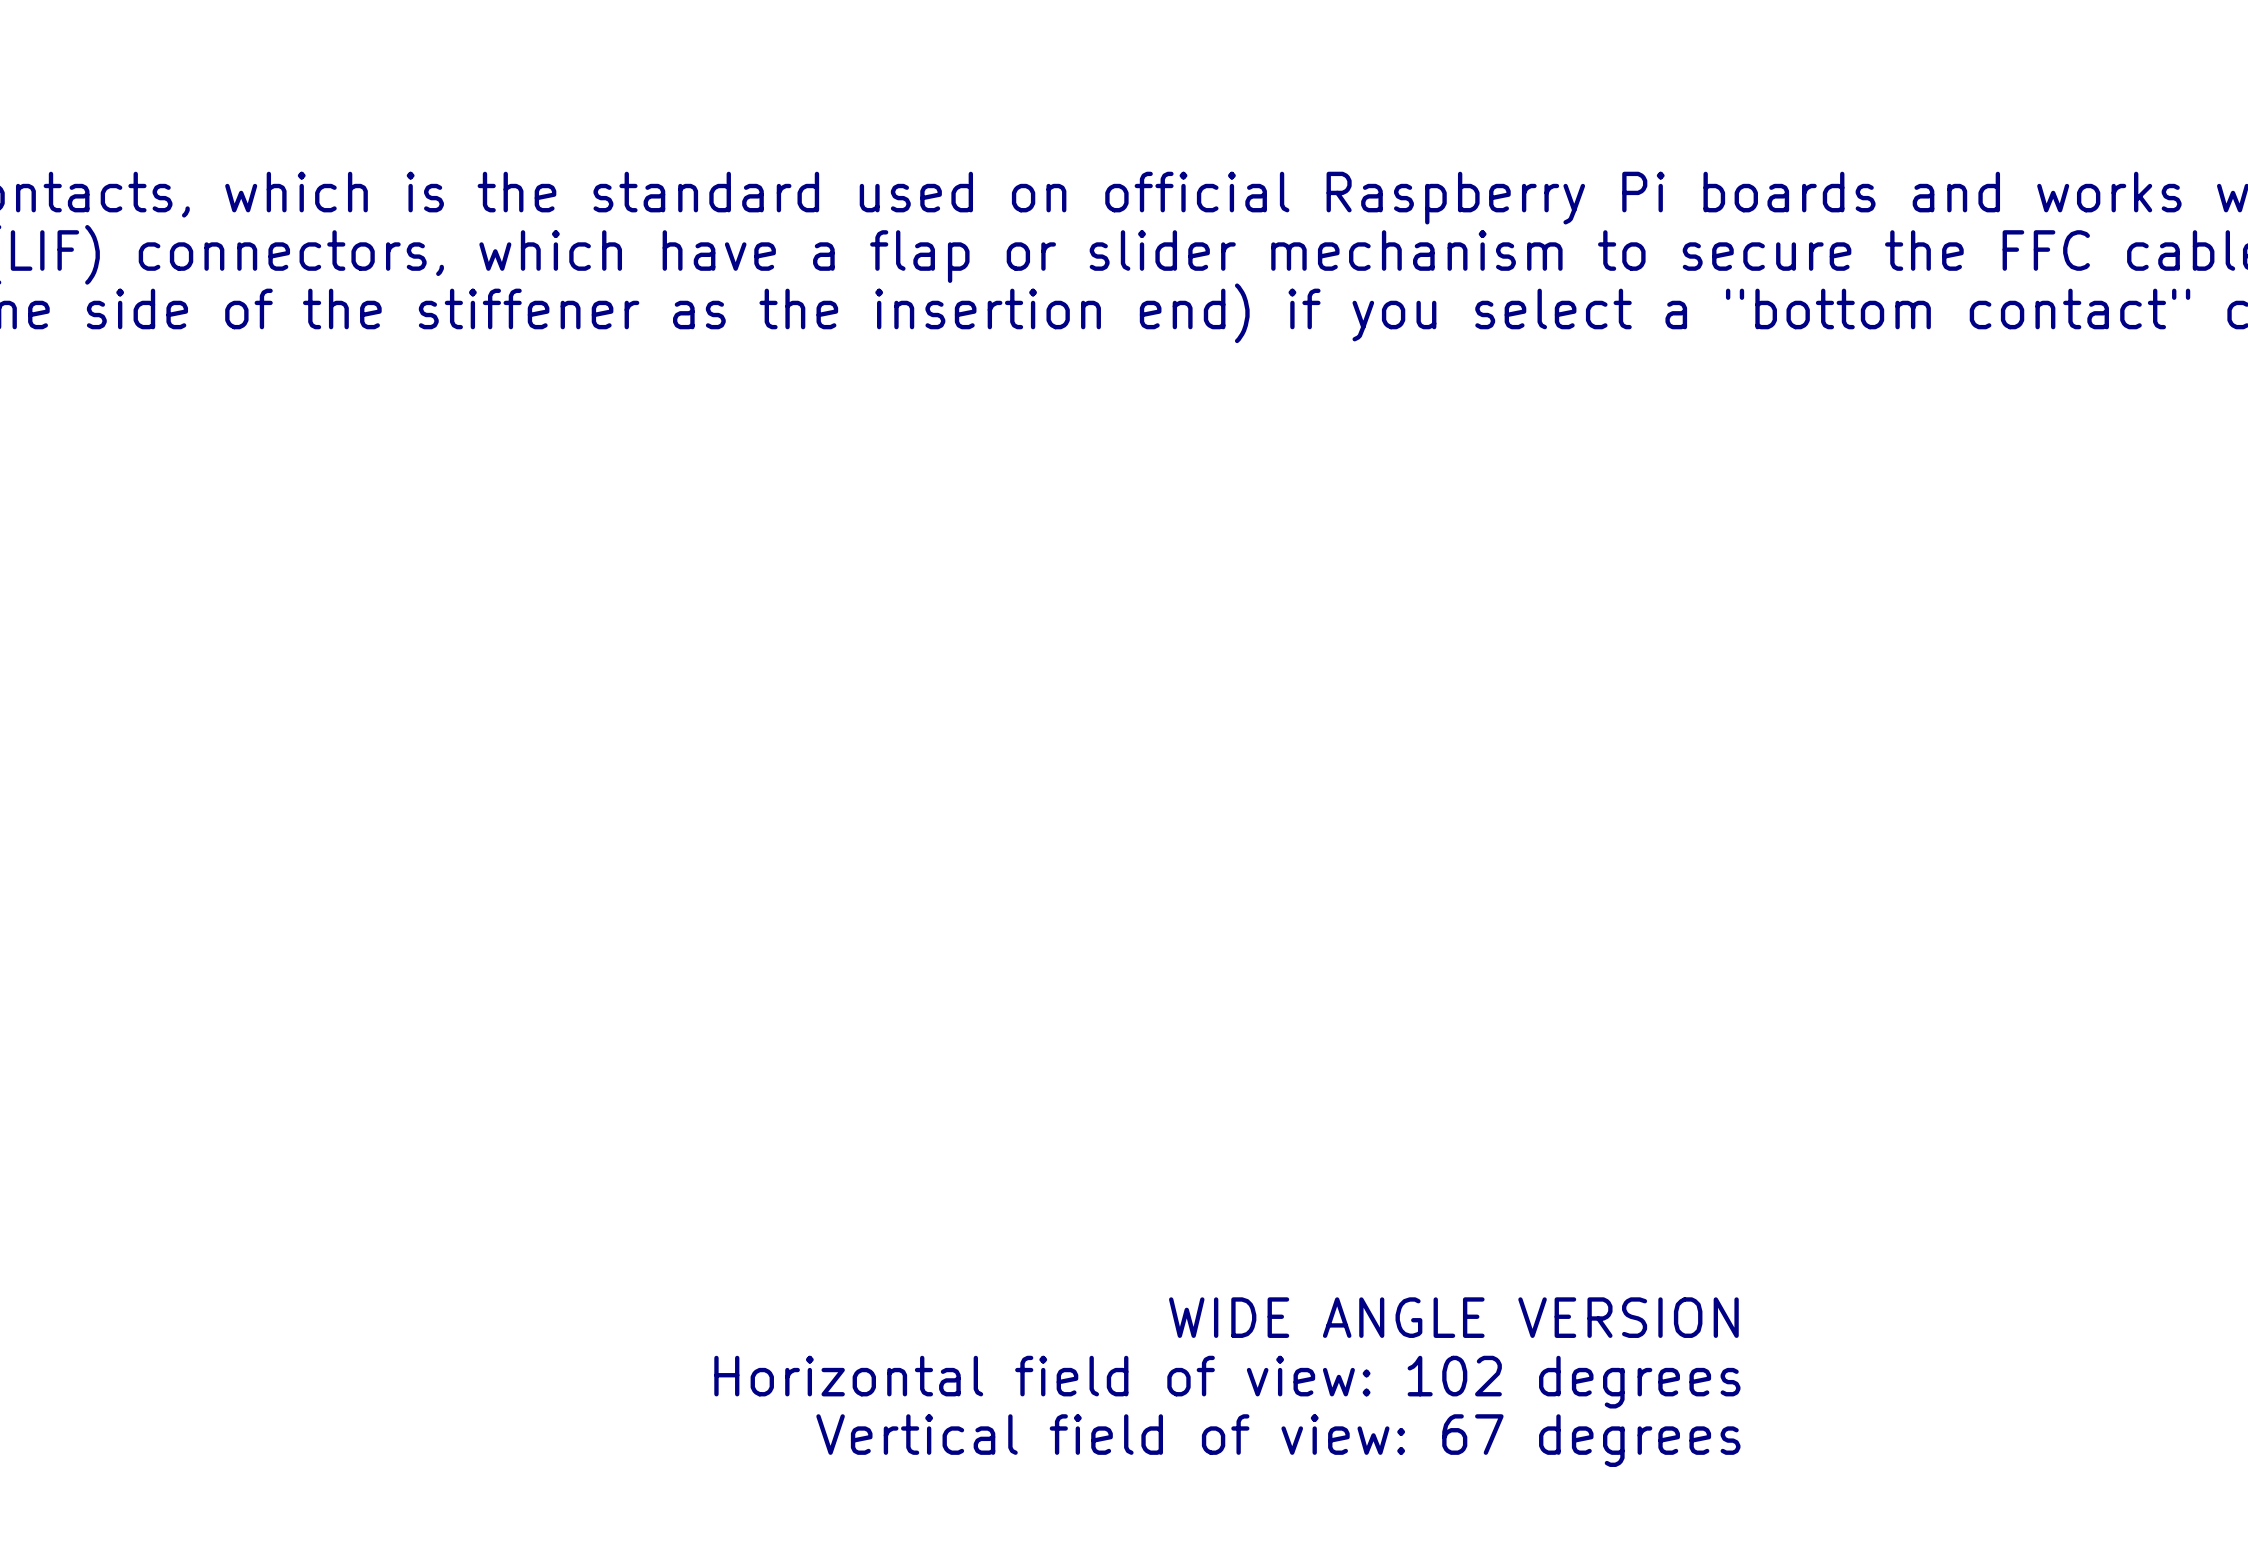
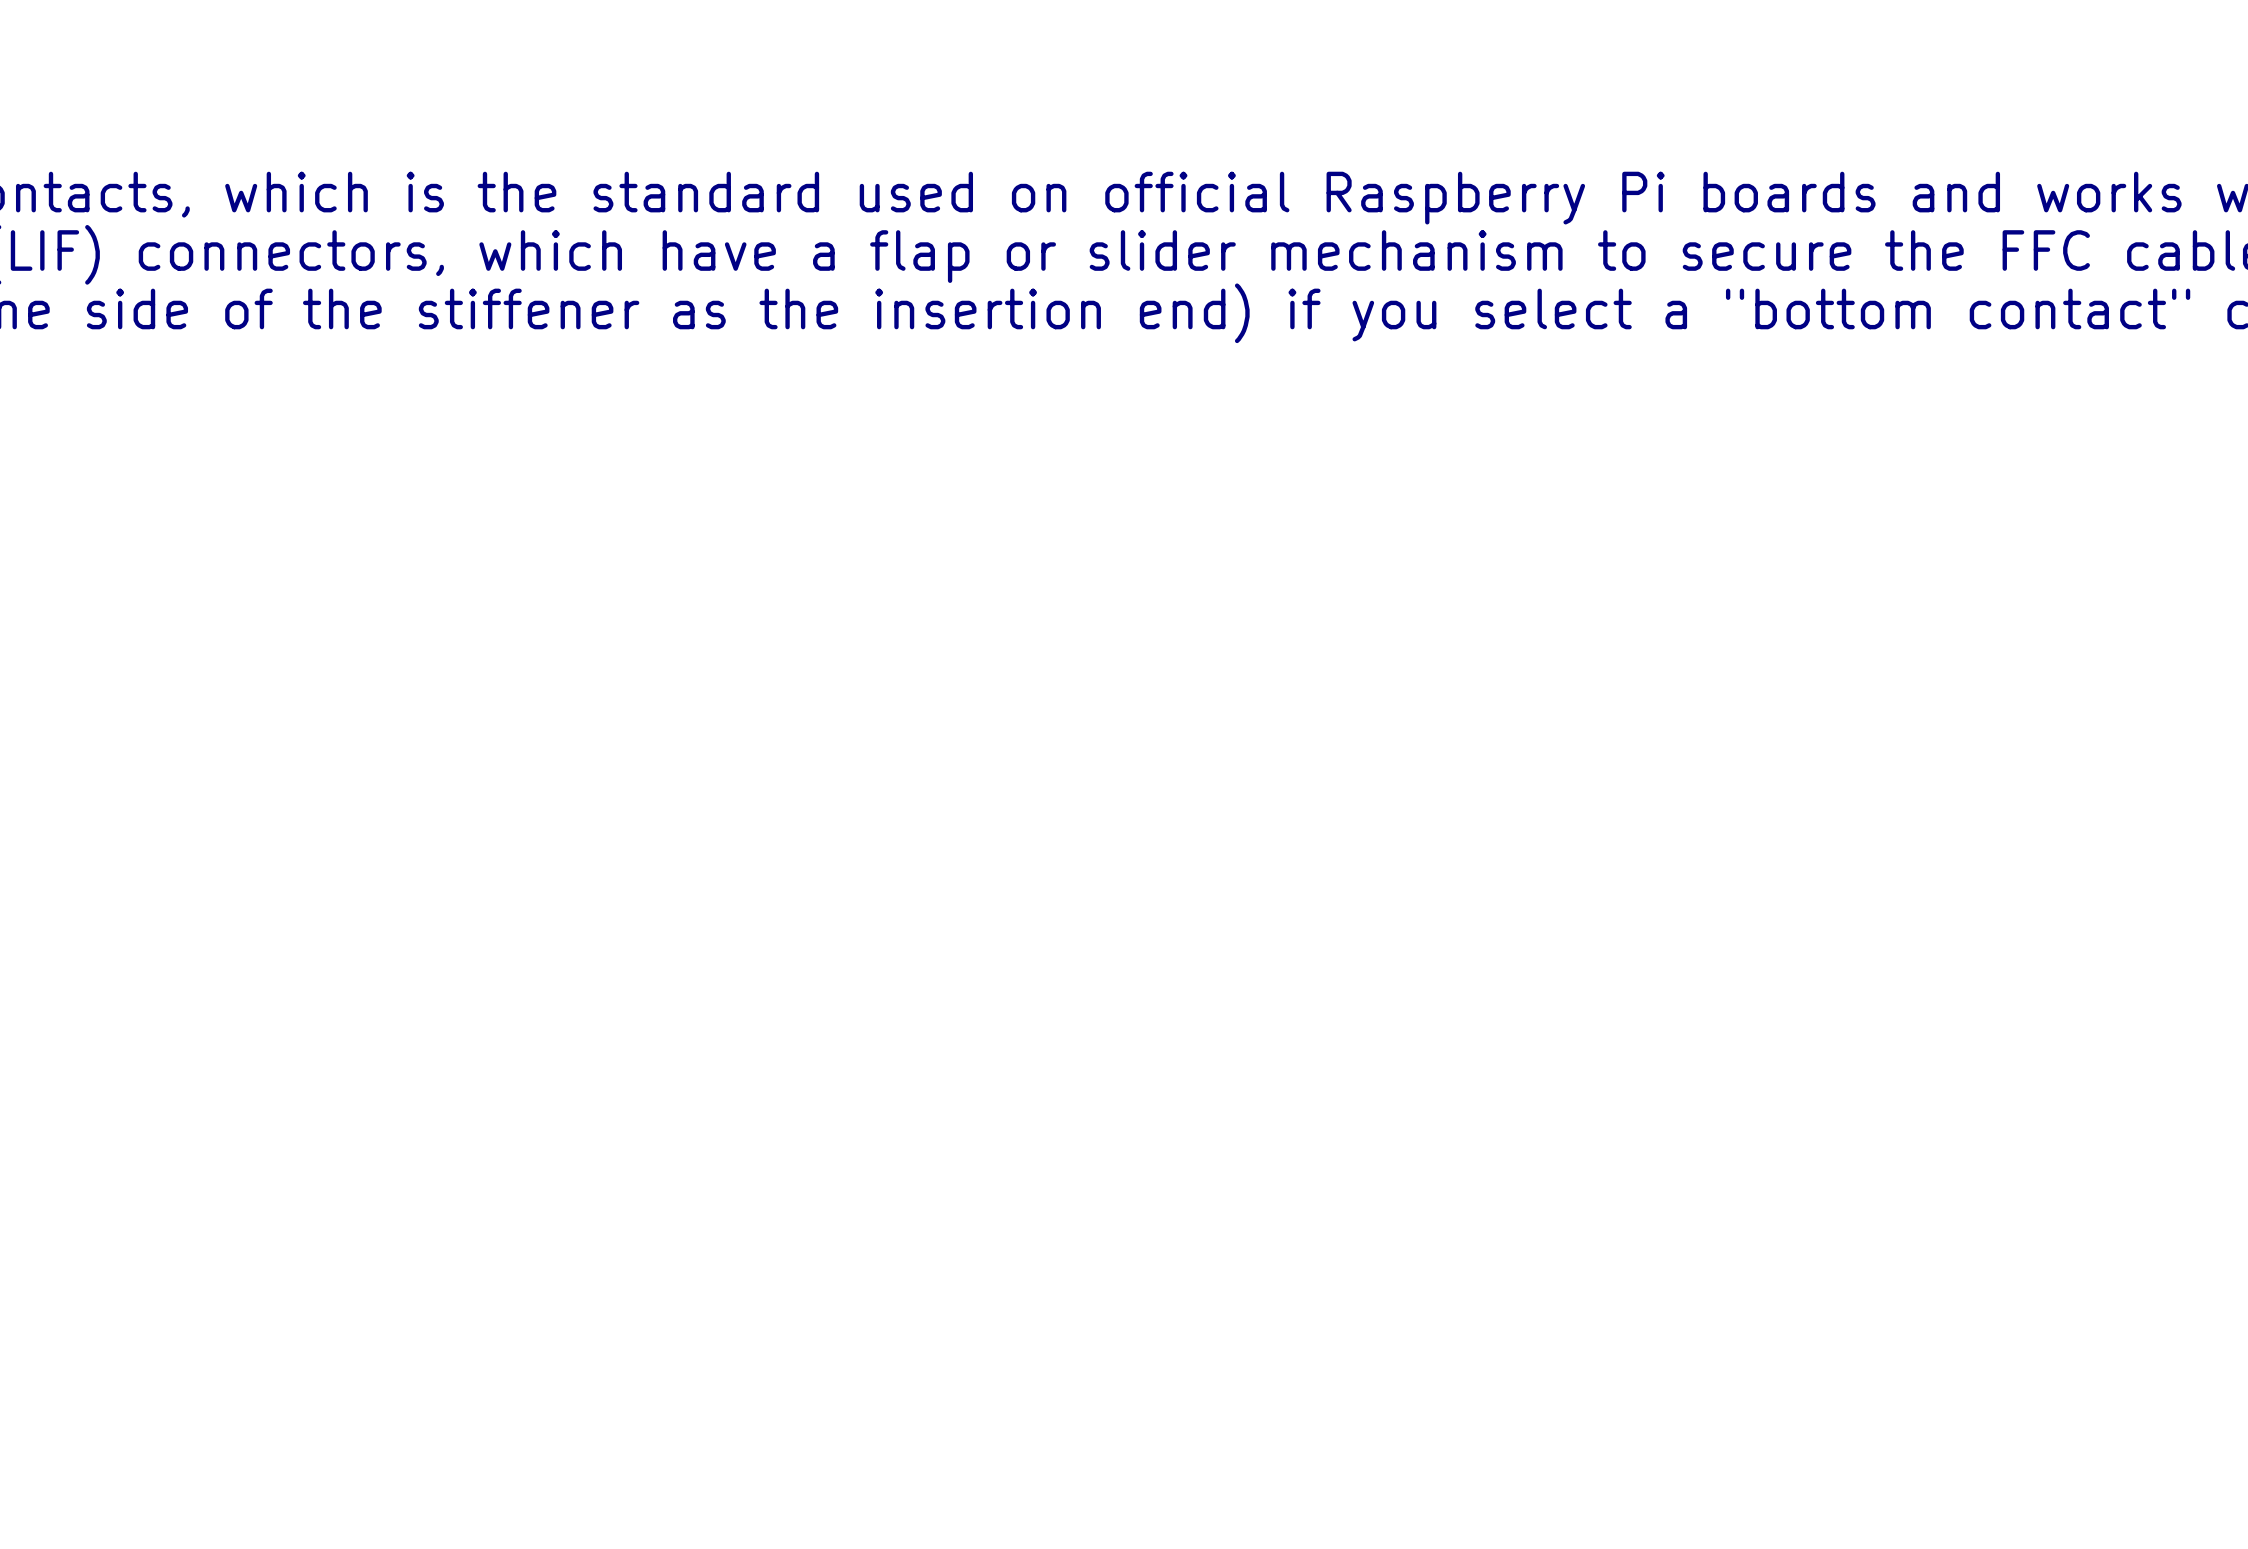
text: WIDE ANGLE VERSION (1453, 1317) -> none
text: Horizontal field of view: 102 degrees (1227, 1382) -> none
text: Vertical field of view: 67 degrees (1278, 1440) -> none

